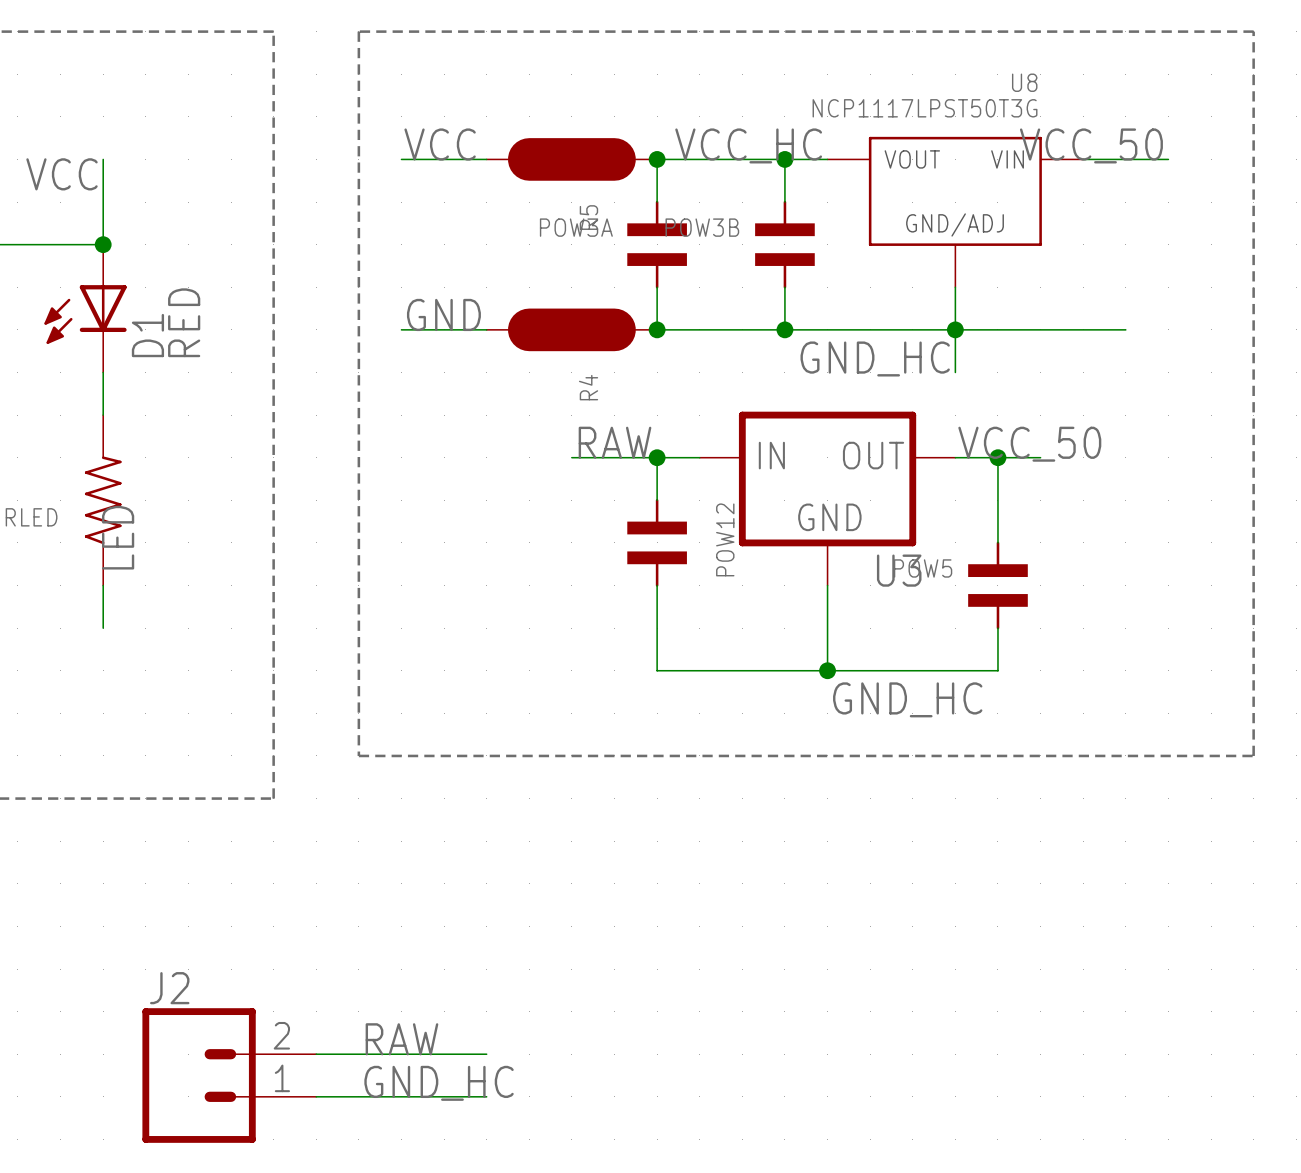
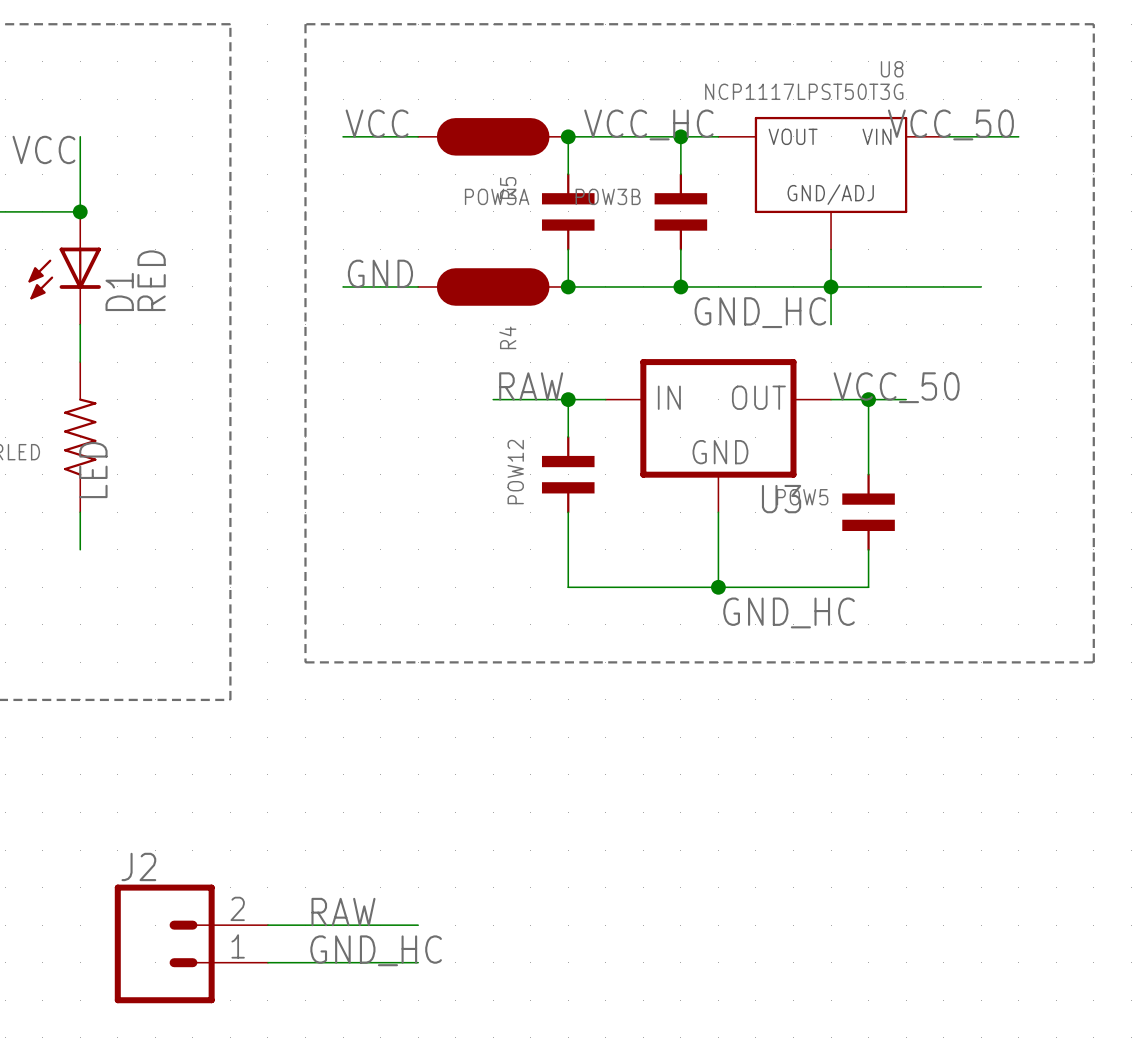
POW12 name position: POW12 (725, 539) -> POW12 (515, 472)

